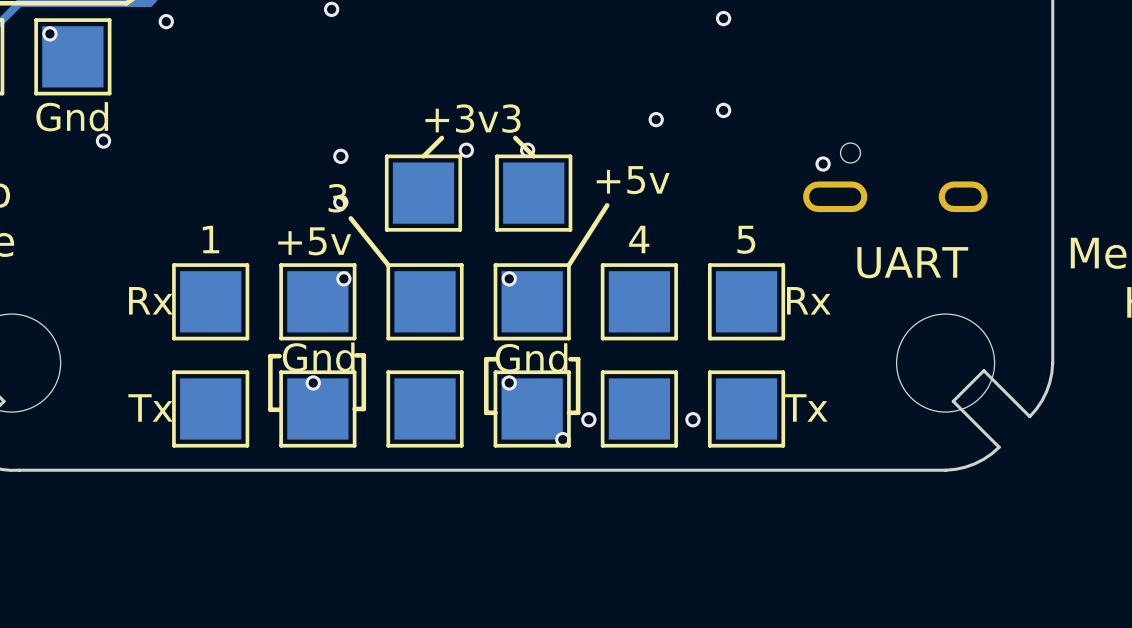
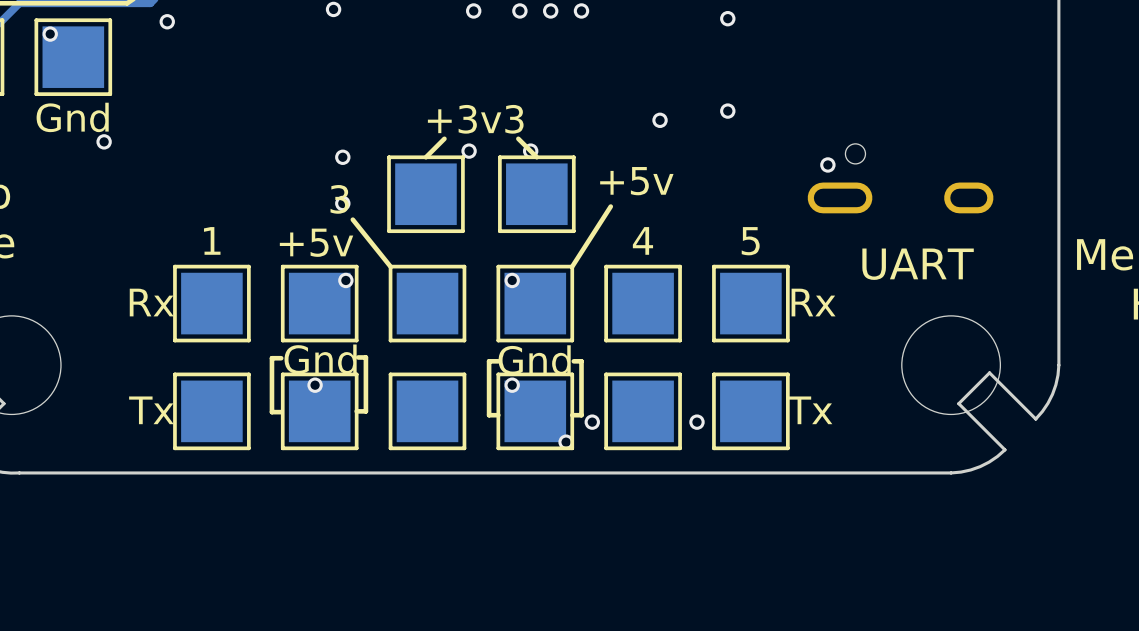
via: none -> (473, 10)
via: none -> (519, 10)
via: none -> (550, 10)
via: none -> (581, 10)

